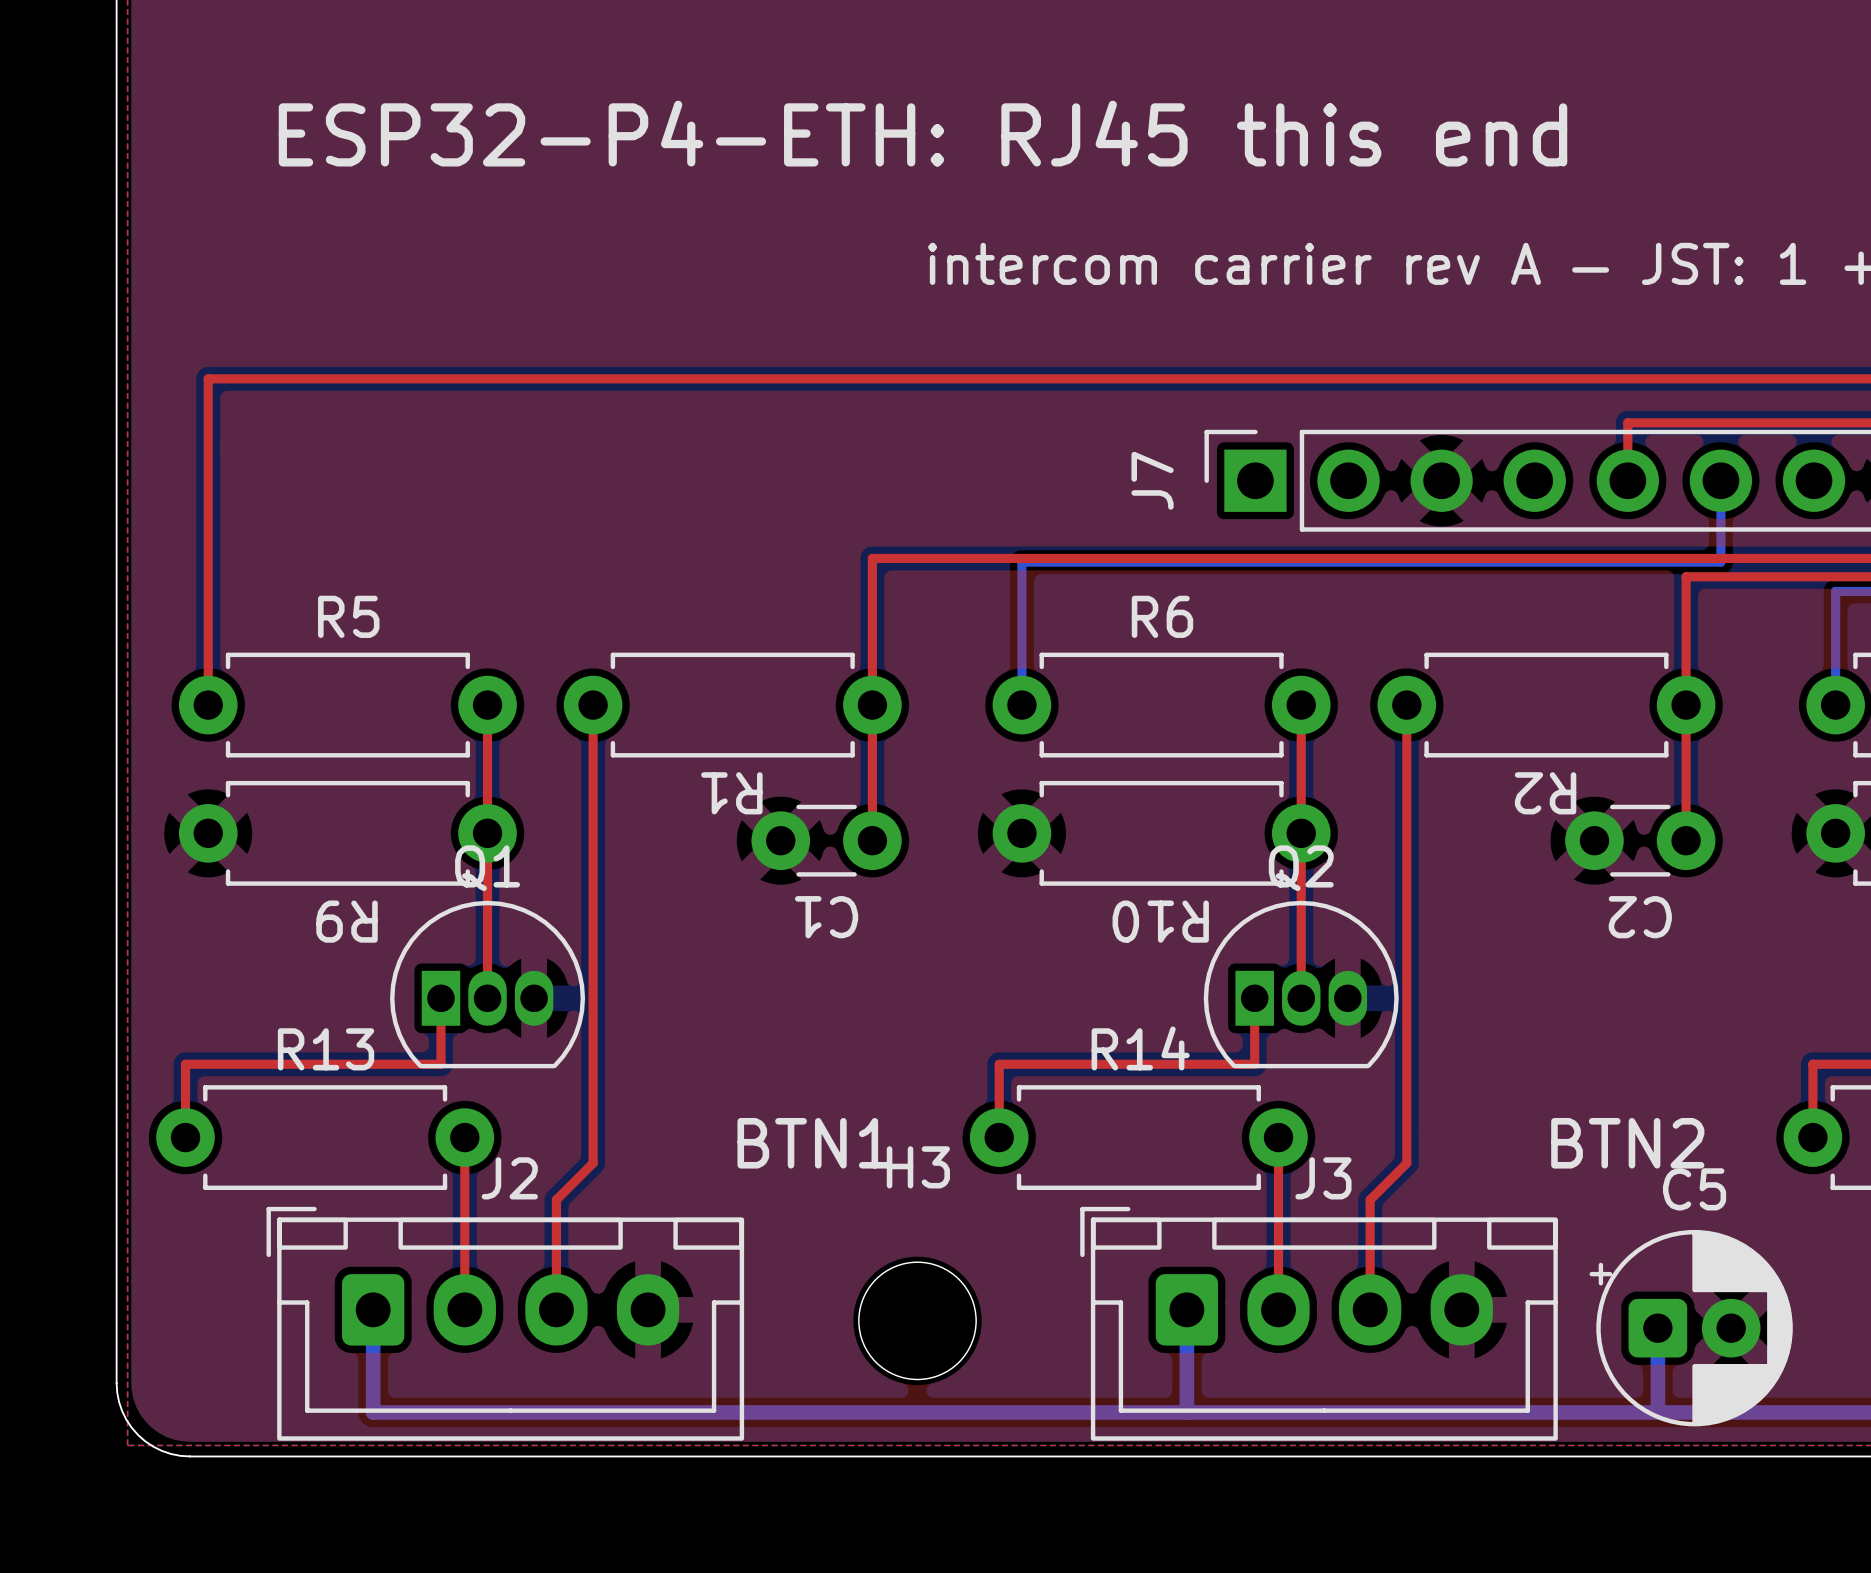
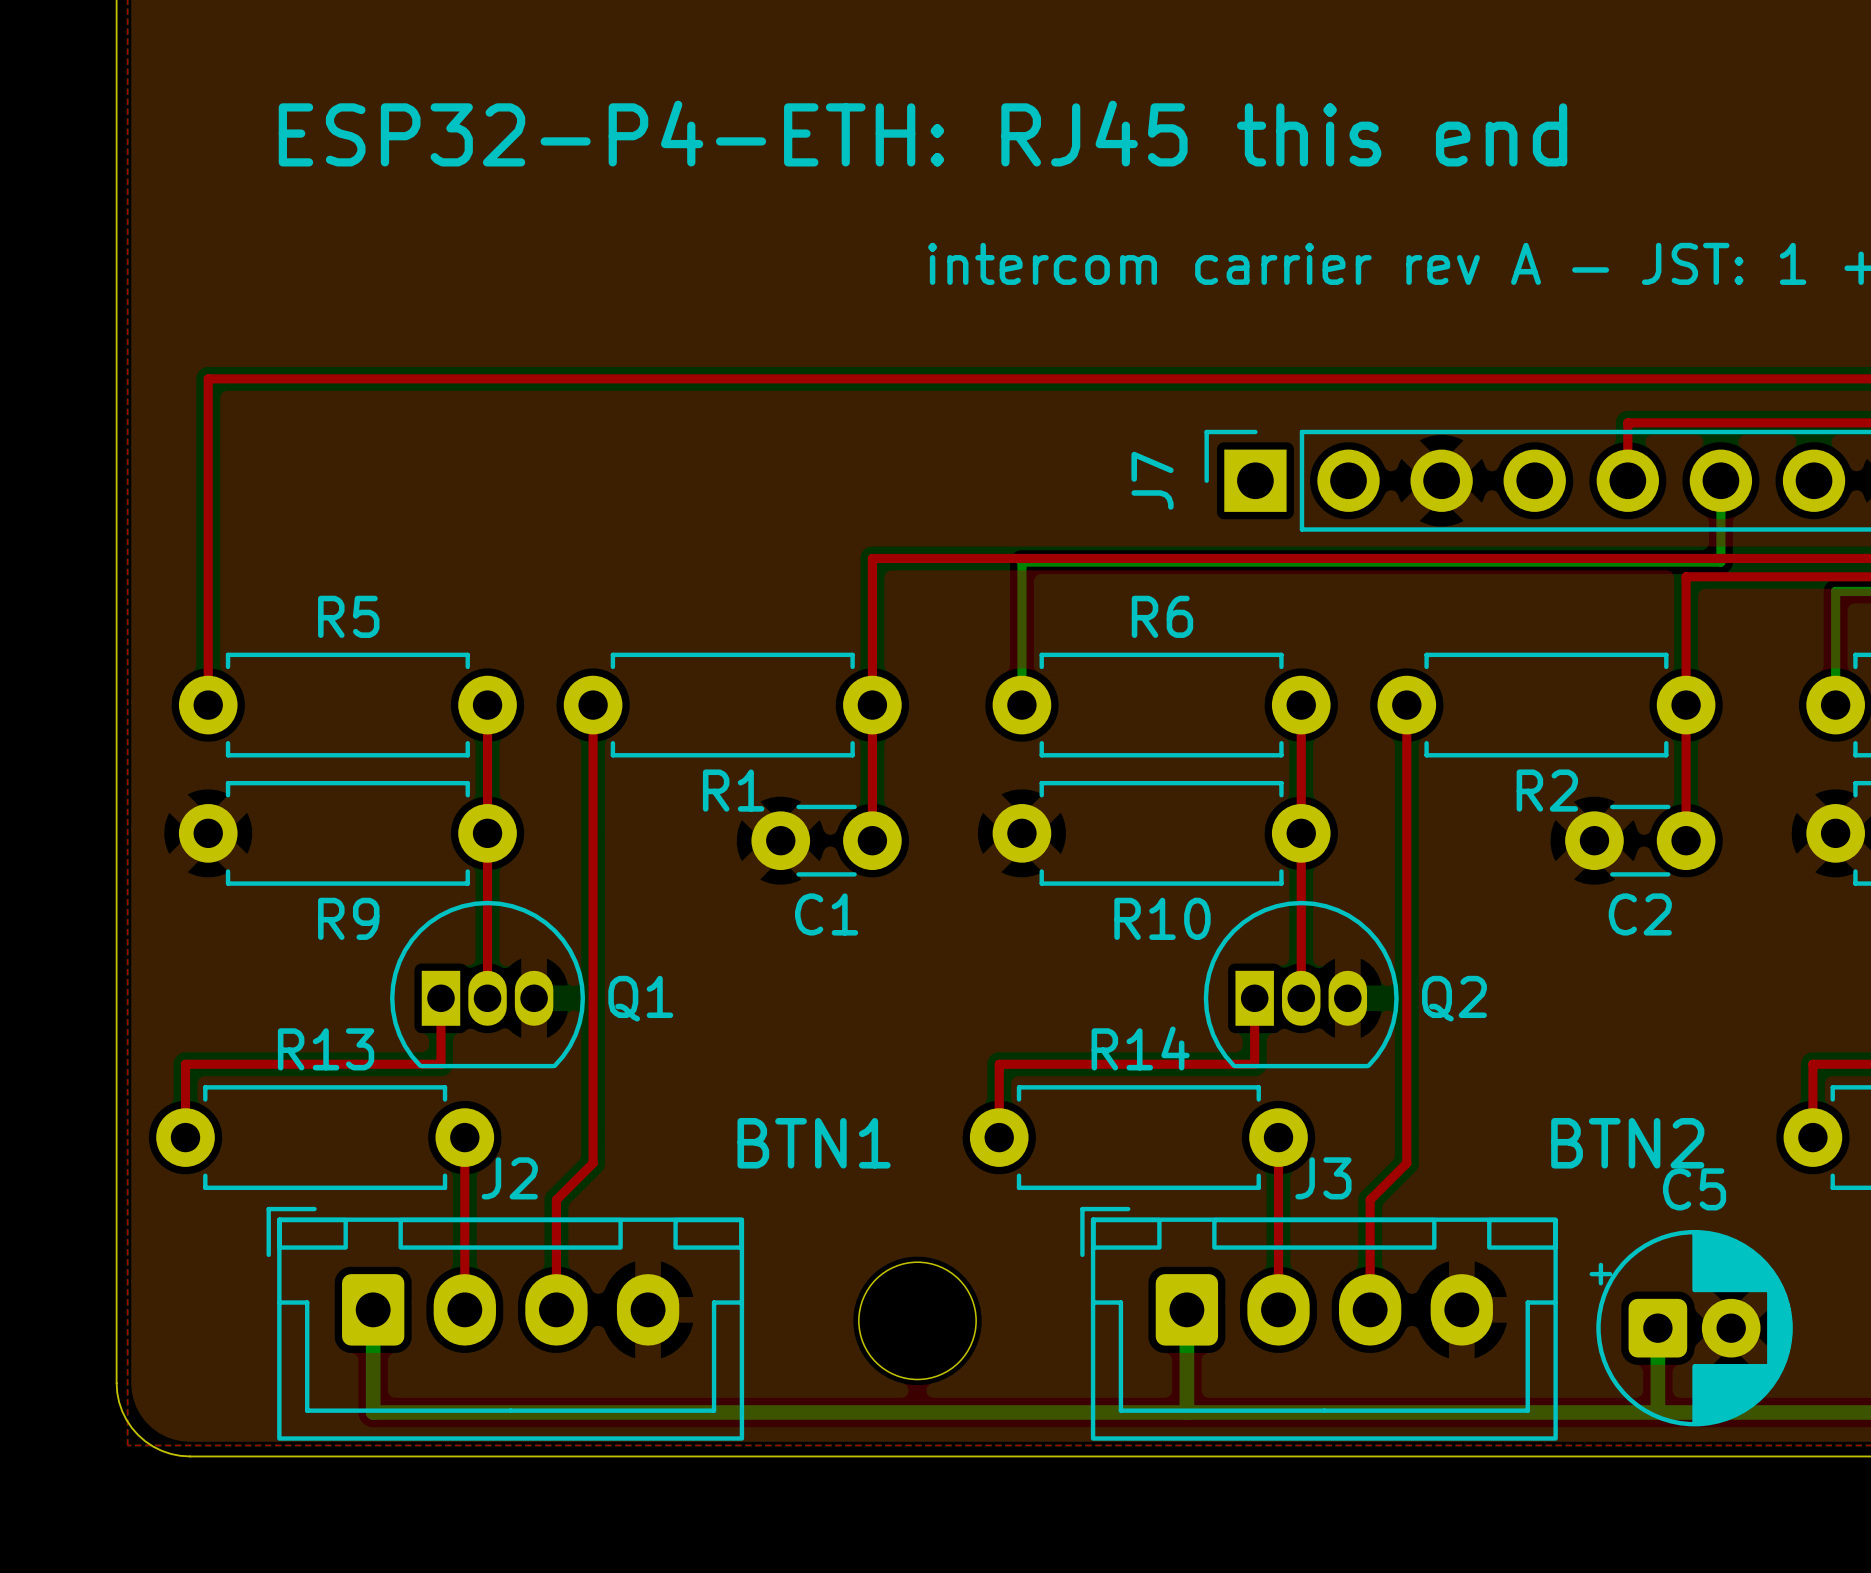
R1 name rotation: 0° (731, 793) -> 180° (733, 790)
R2 name rotation: 0° (1545, 793) -> 180° (1547, 790)
Q1 name position: Q1 (487, 868) -> Q1 (640, 998)
Q2 name position: Q2 (1301, 868) -> Q2 (1454, 998)
C1 name rotation: 0° (826, 917) -> 180° (826, 914)
C2 name rotation: 0° (1640, 917) -> 180° (1640, 914)
R9 name rotation: 0° (347, 921) -> 180° (348, 918)
R10 name rotation: 0° (1160, 921) -> 180° (1162, 918)
H3 name: H3 (918, 1167) -> none

